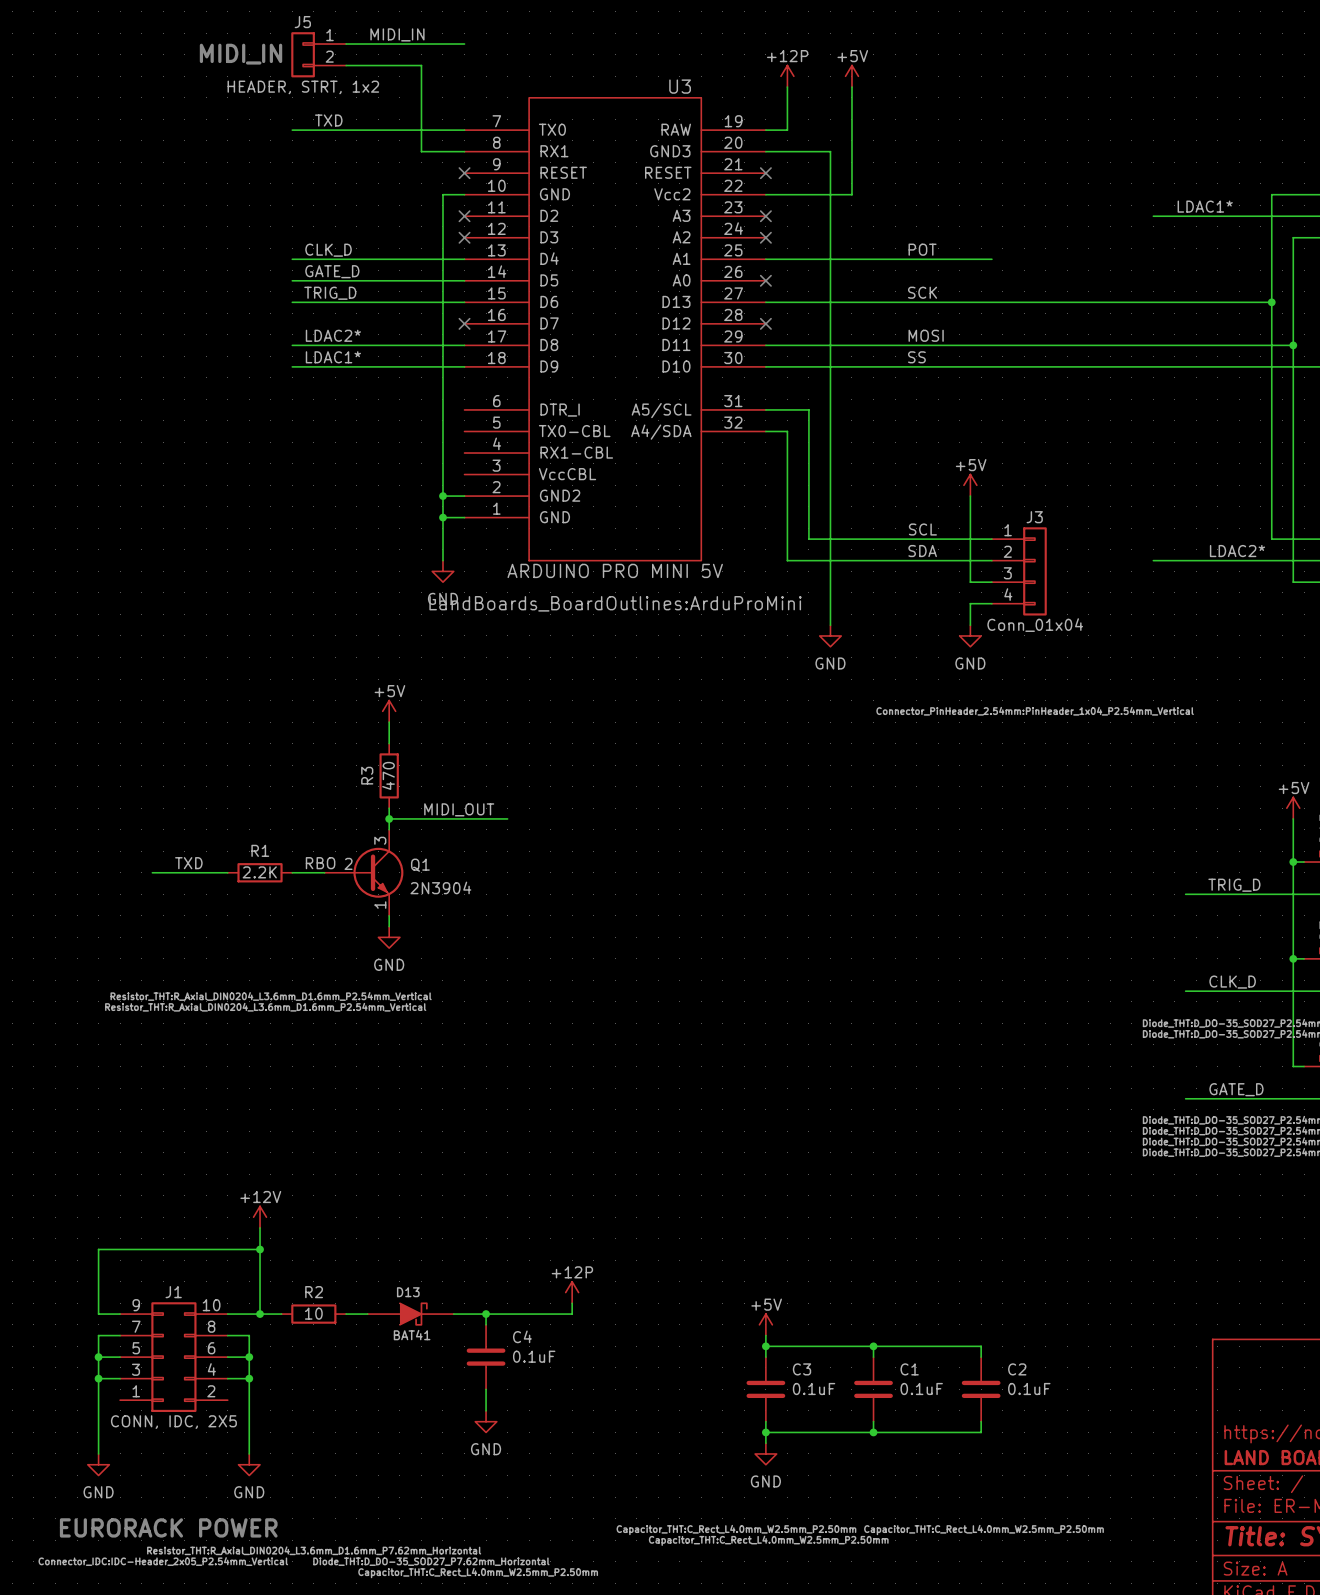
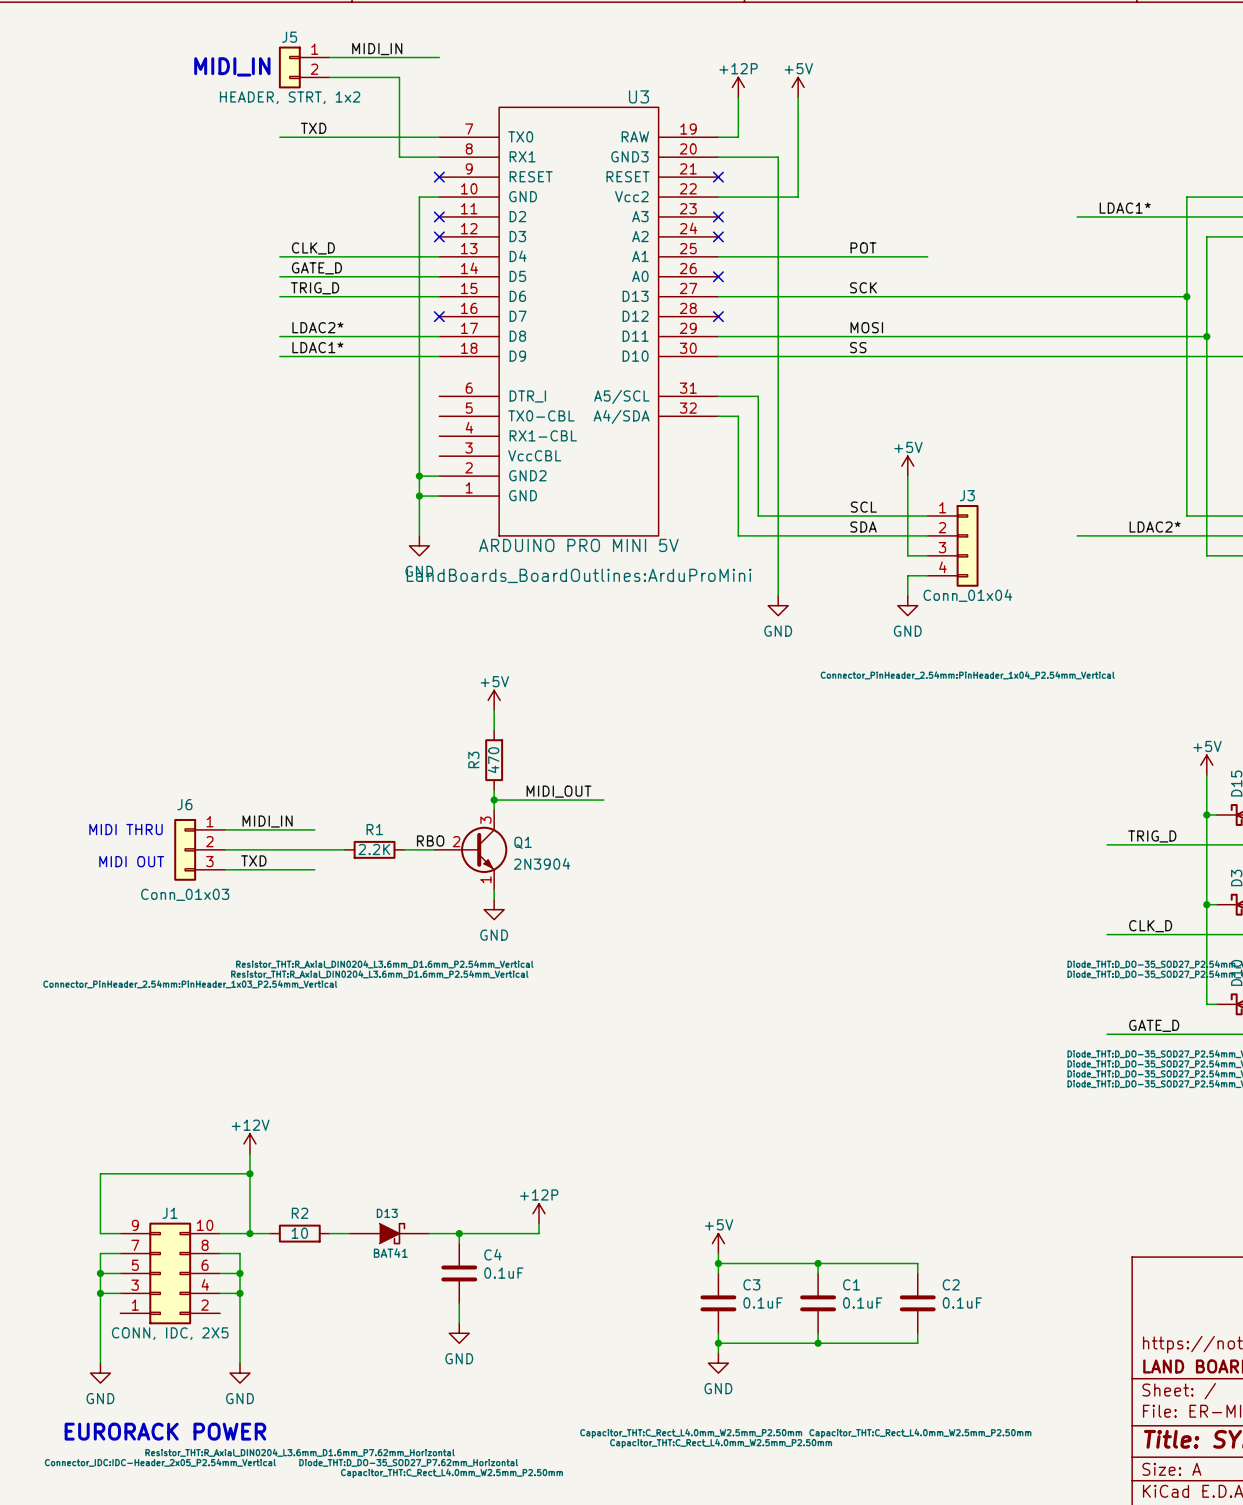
power symbol position: +5V (389, 711) -> +5V (494, 700)
wire: (389, 722) (389, 743) -> (494, 710) (494, 730)
R3 position: (389, 775) -> (494, 760)
wire: (389, 808) (389, 829) -> (494, 790) (494, 810)
label position: MIDI_OUT (459, 809) -> MIDI_OUT (559, 791)
wire: (389, 818) (507, 818) -> (494, 800) (603, 800)
junction: (389, 818) -> none
junction: none -> (494, 800)
label position: TXD (188, 863) -> TXD (253, 860)
label position: RBO (320, 863) -> RBO (430, 840)
label: none -> MIDI_IN (267, 821)
wire: (152, 872) (227, 872) -> none
R1 position: (260, 872) -> (374, 849)
wire: (292, 872) (324, 872) -> (404, 849) (434, 849)
Q1 position: (363, 872) -> (470, 849)
text: none -> MIDI THRU (126, 829)
wire: none -> (225, 829) (314, 829)
J6: none -> Conn_01x03 (199, 849)
wire: none -> (225, 849) (344, 849)
text: none -> MIDI OUT (131, 861)
wire: (389, 915) (389, 926) -> (494, 889) (494, 899)
wire: none -> (225, 869) (314, 869)
power symbol position: GND (389, 937) -> GND (494, 909)

